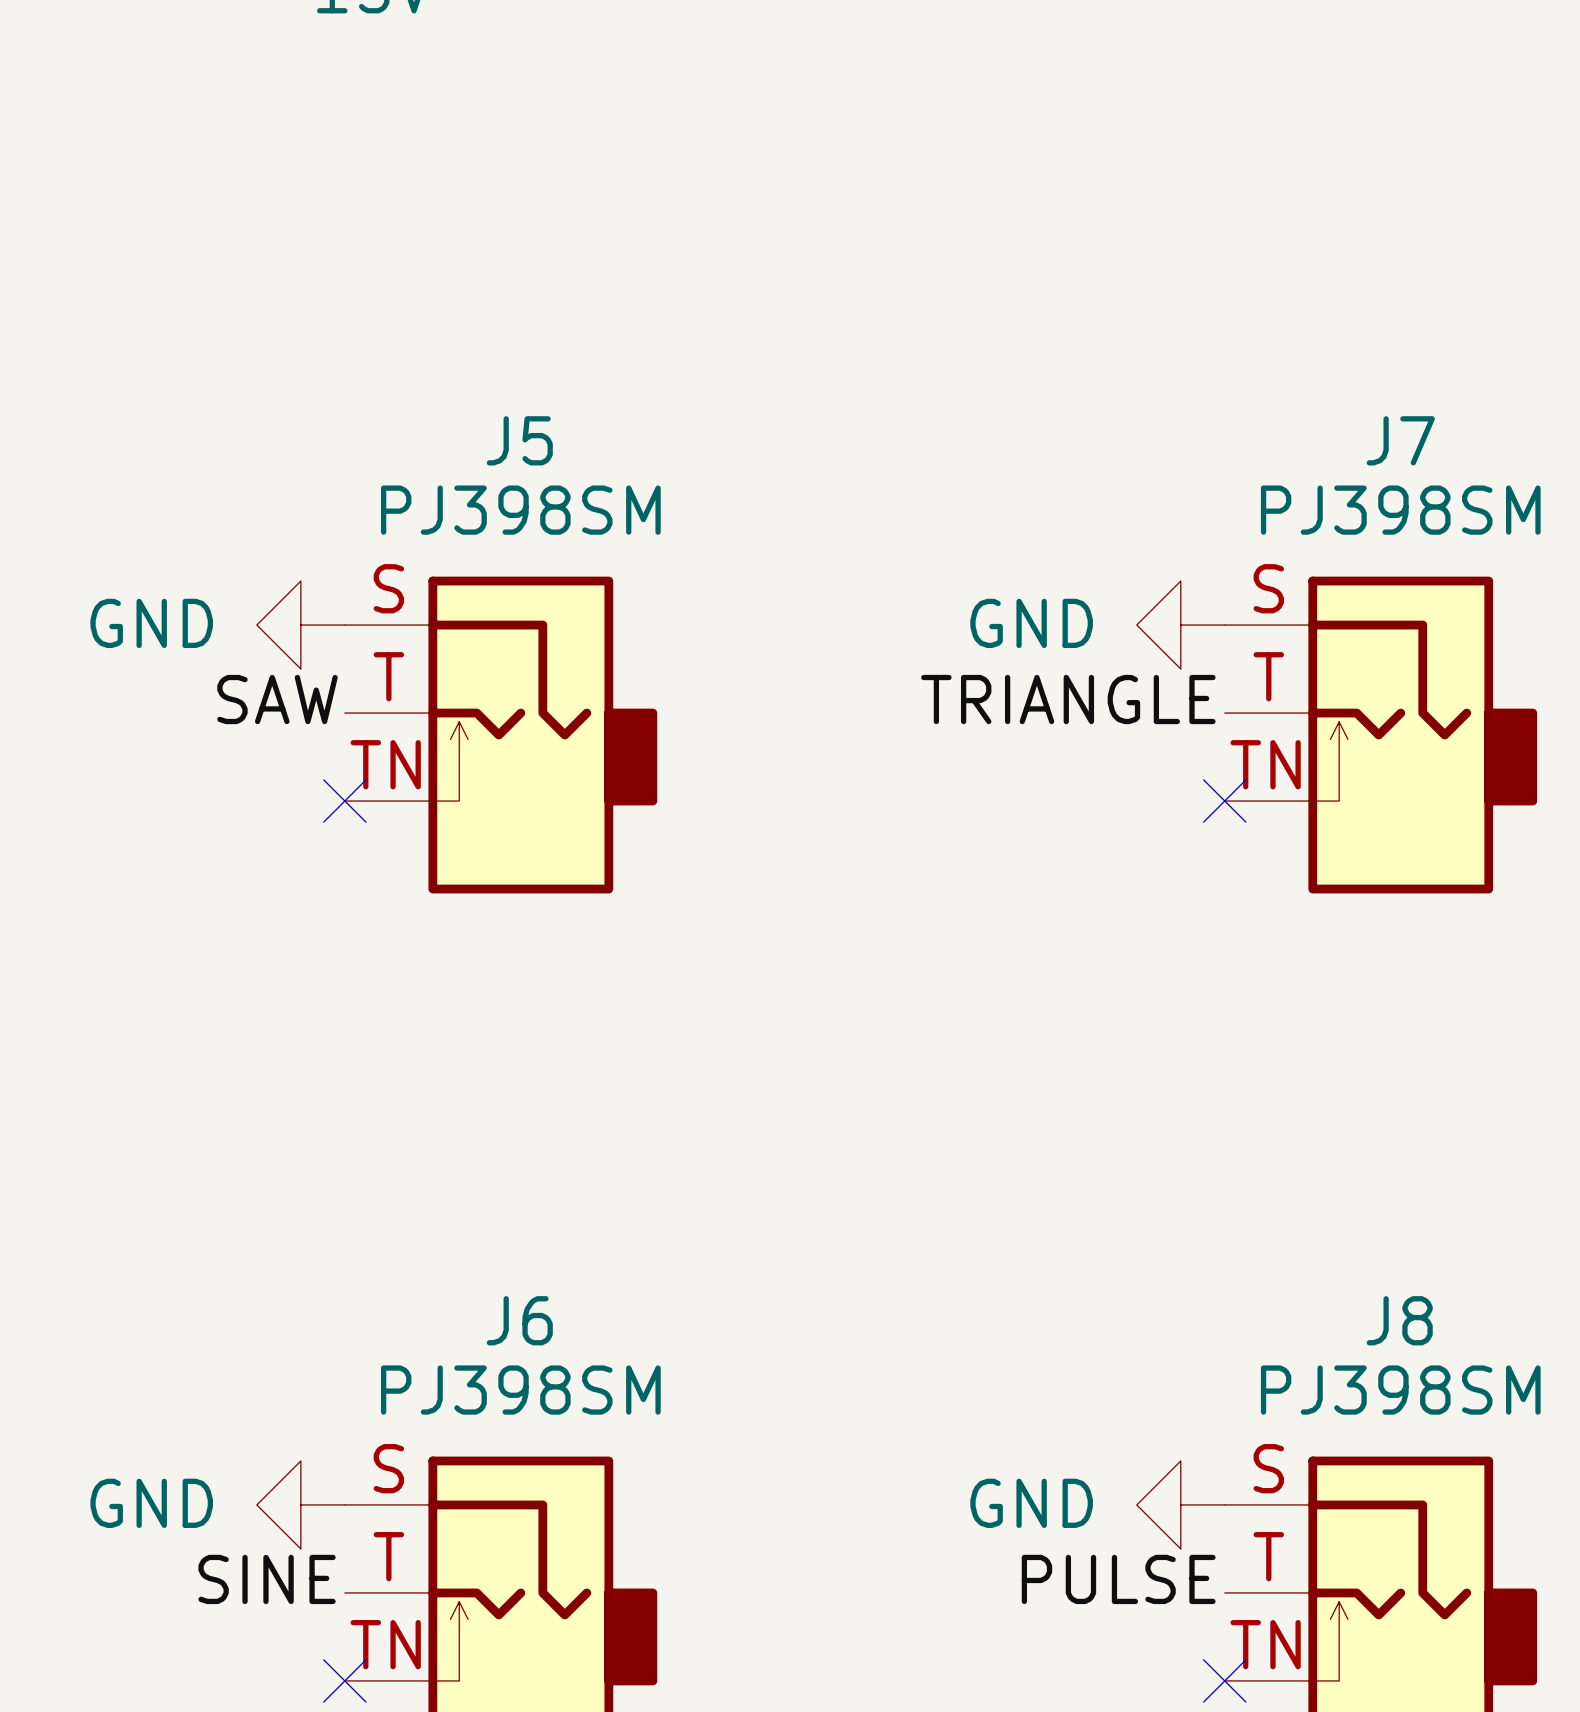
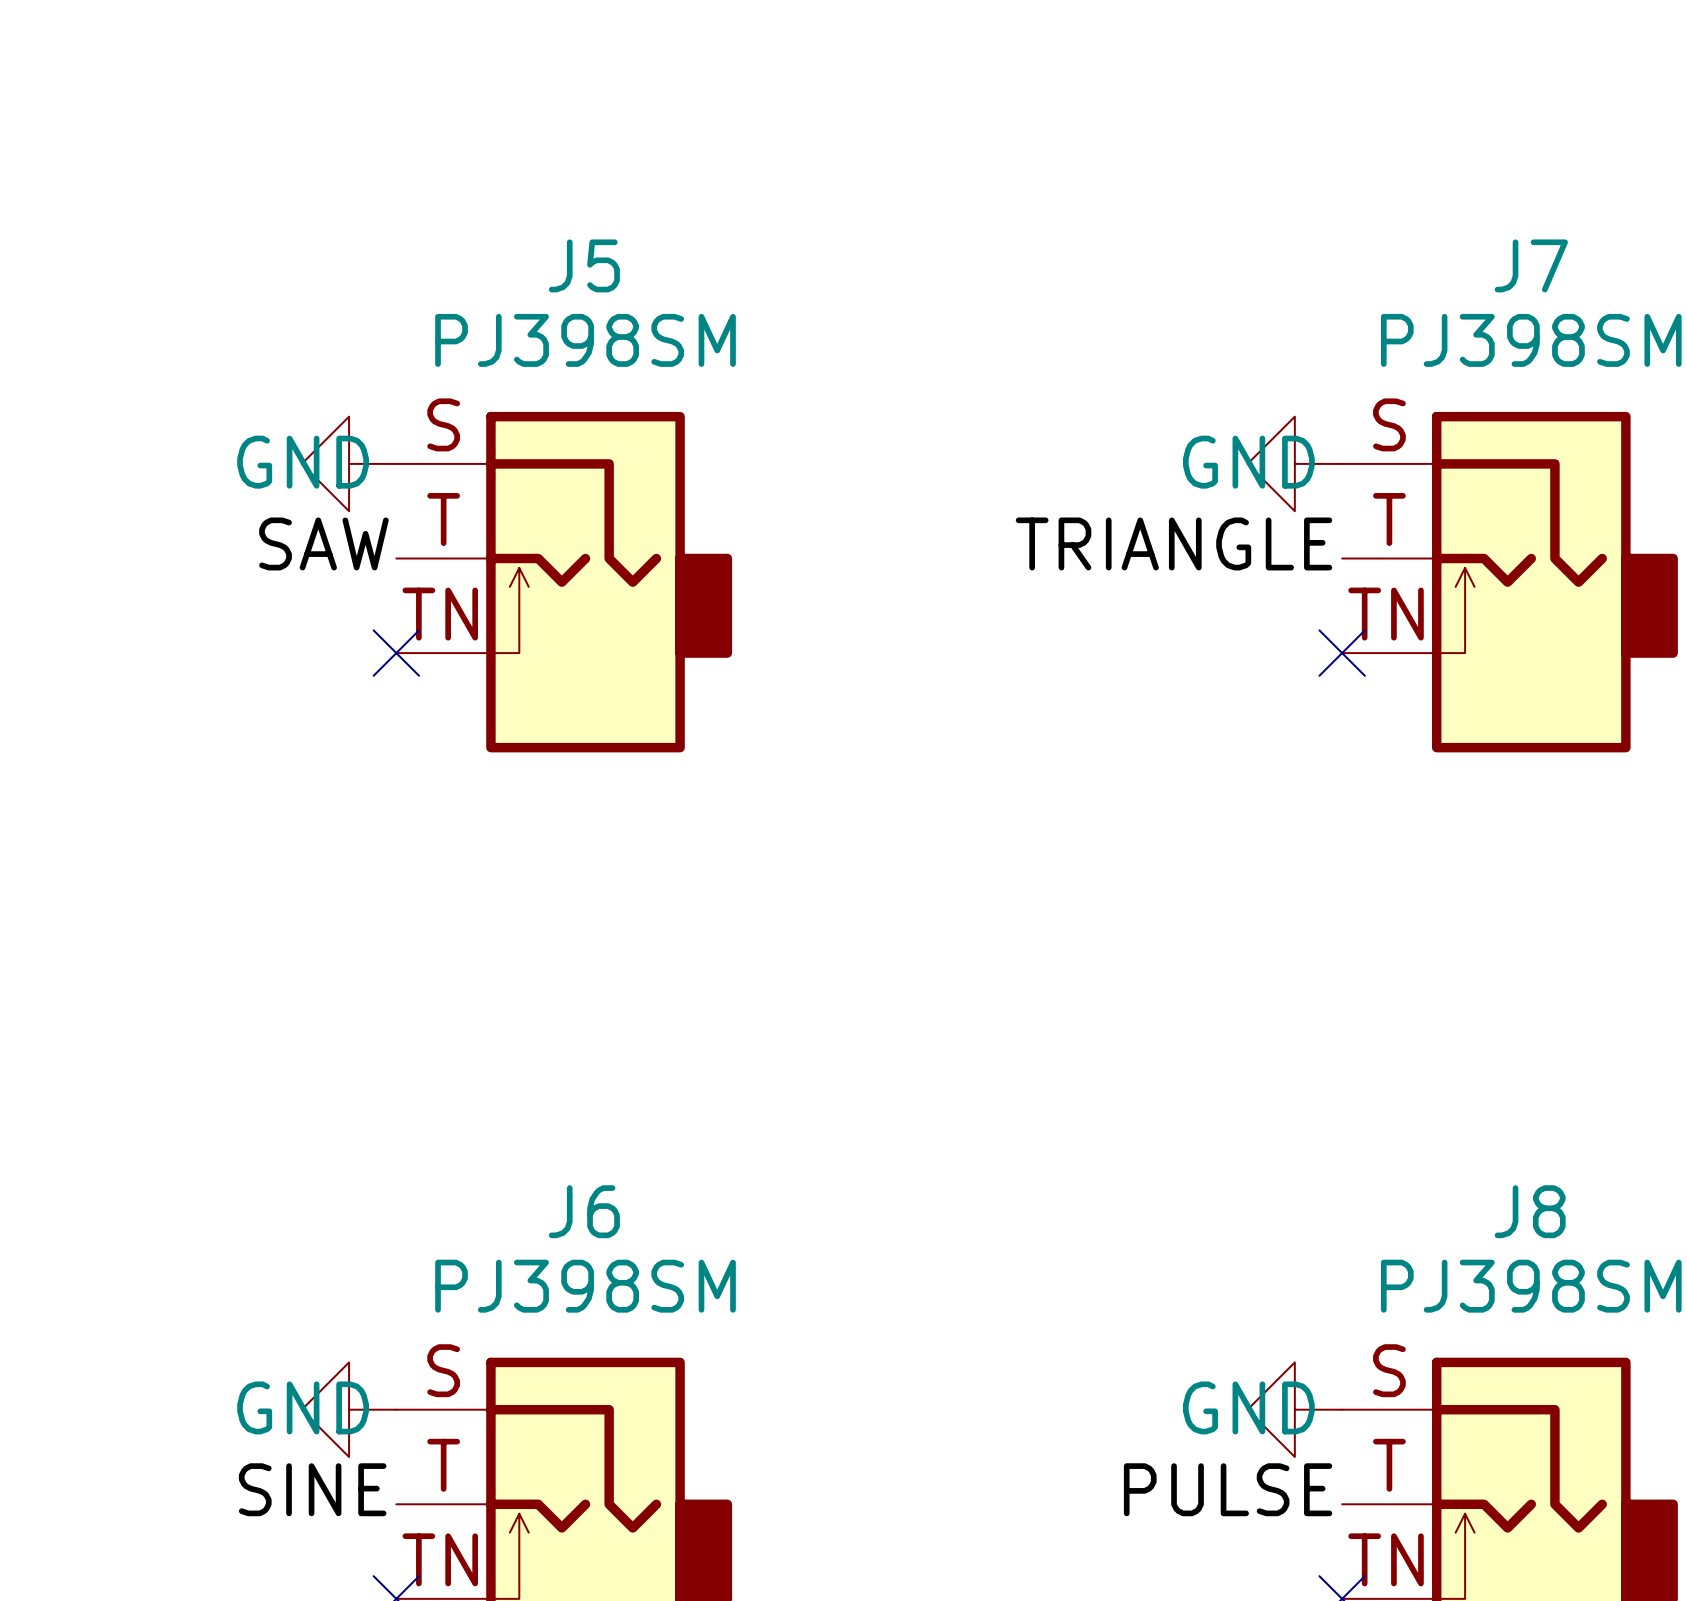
power symbol text position: GND (151, 623) -> GND (303, 462)
power symbol text position: GND (1031, 623) -> GND (1248, 462)
power symbol text position: GND (151, 1503) -> GND (303, 1407)
power symbol text position: GND (1031, 1503) -> GND (1248, 1407)

